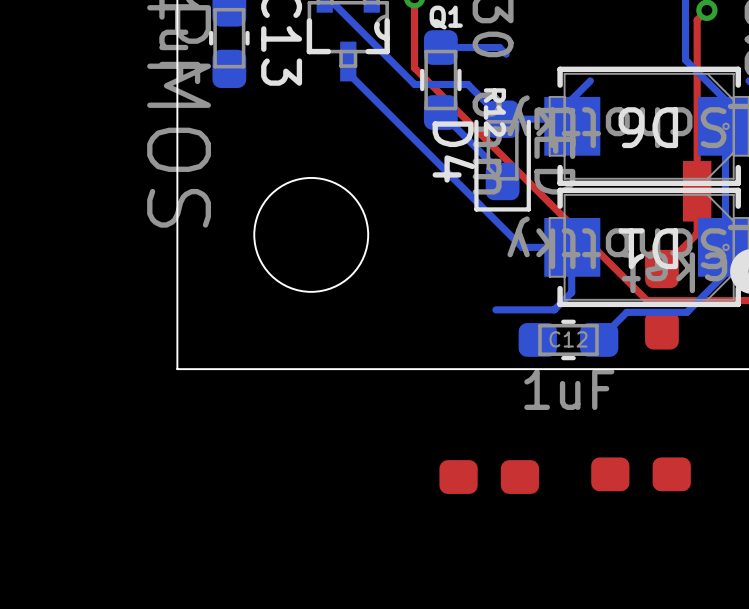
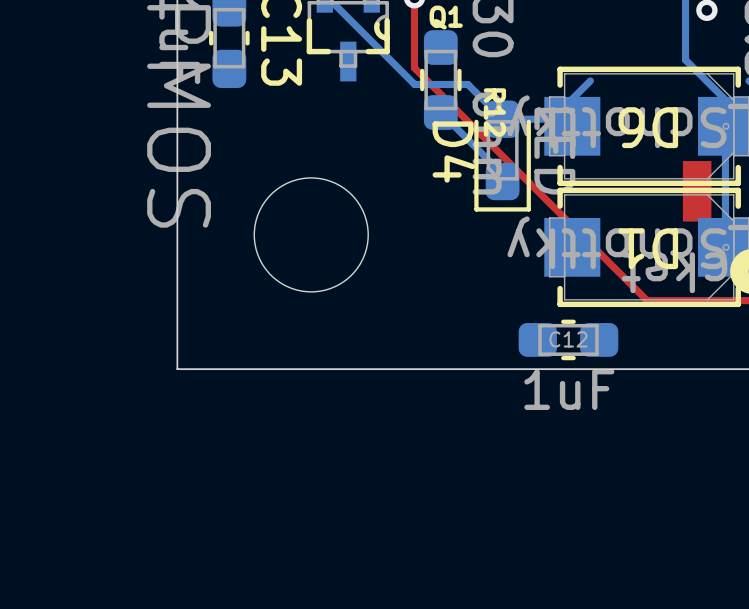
top track: (706, 10) (697, 20) (697, 233) (661, 268) -> none
bottom track: (440, 47) (499, 47) (506, 54) -> none
bottom track: (348, 61) (348, 73) (522, 247) (572, 247) -> none
bottom track: (726, 247) (726, 273) (686, 312) (626, 312) (599, 339) -> none
bottom track: (571, 257) (571, 292) (554, 309) (495, 309) -> none
part: (661, 299) -> none
part: (641, 474) -> none
part: (489, 477) -> none

